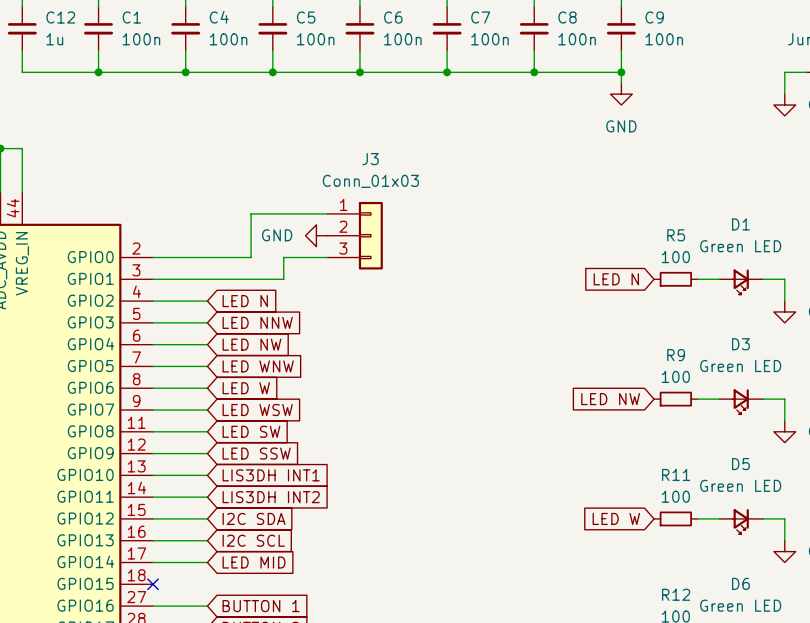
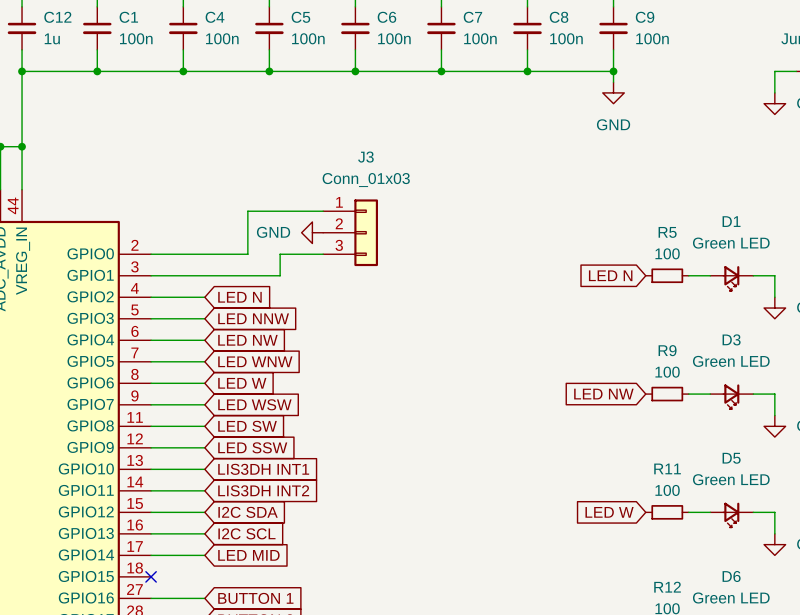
wire: none -> (22, 71) (22, 146)
junction: none -> (22, 71)
junction: none -> (22, 146)

